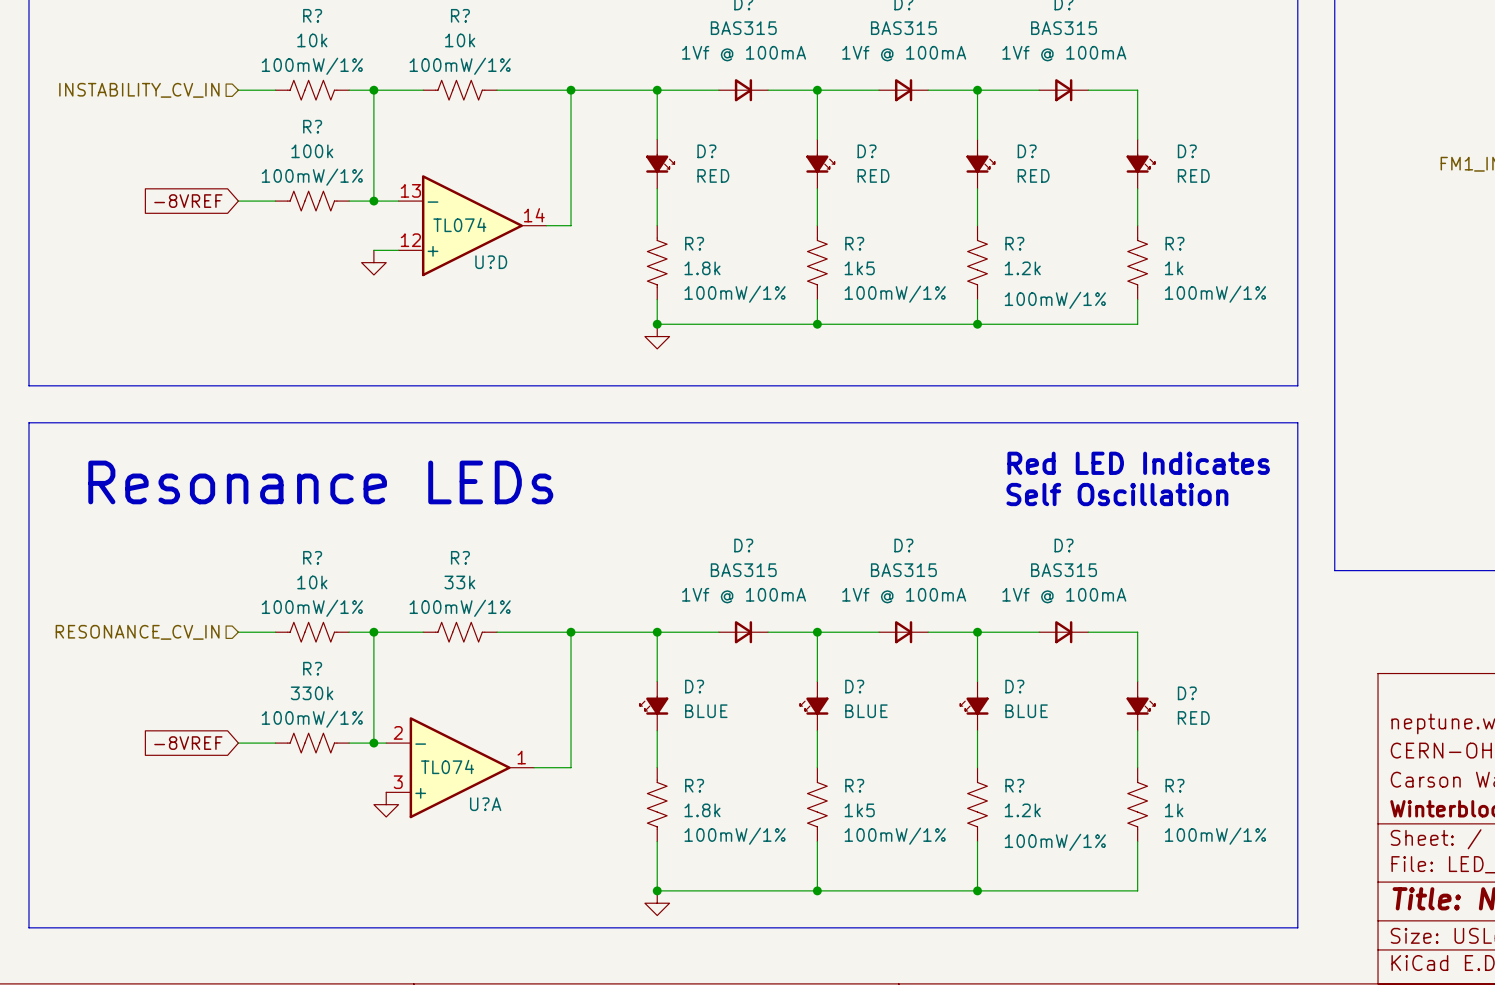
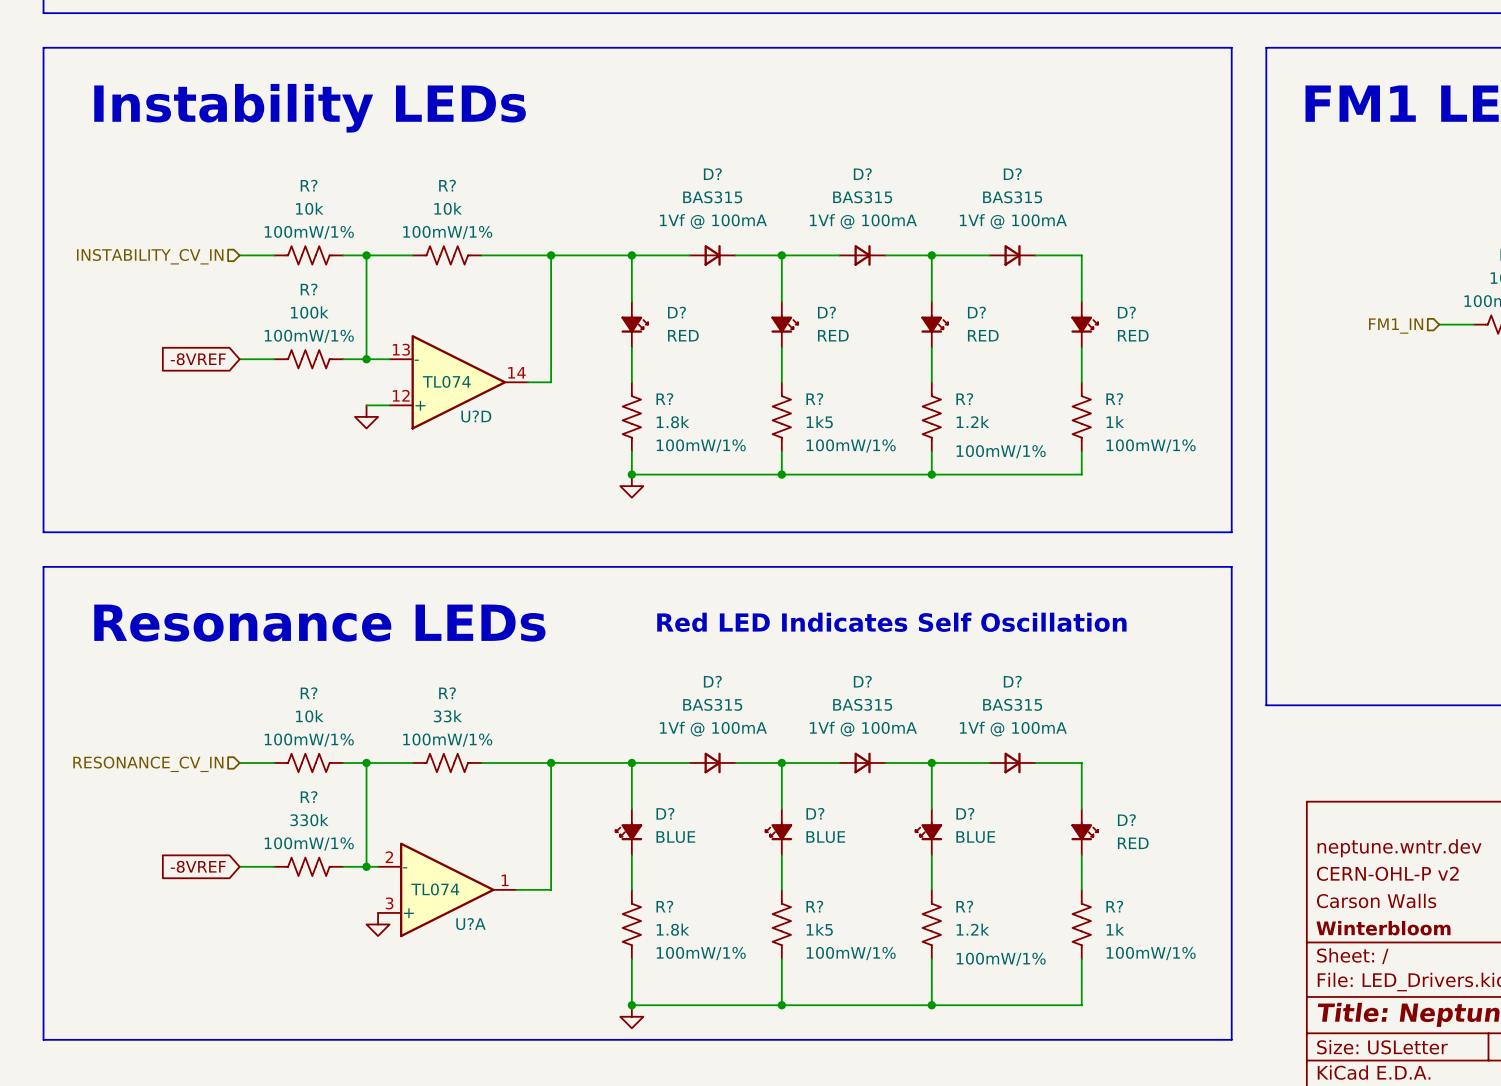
text: Red LED Indicates (1138, 463) -> none
text: none -> Red LED Indicates Self Oscillation (891, 622)
text: Self Oscillation (1117, 494) -> none

